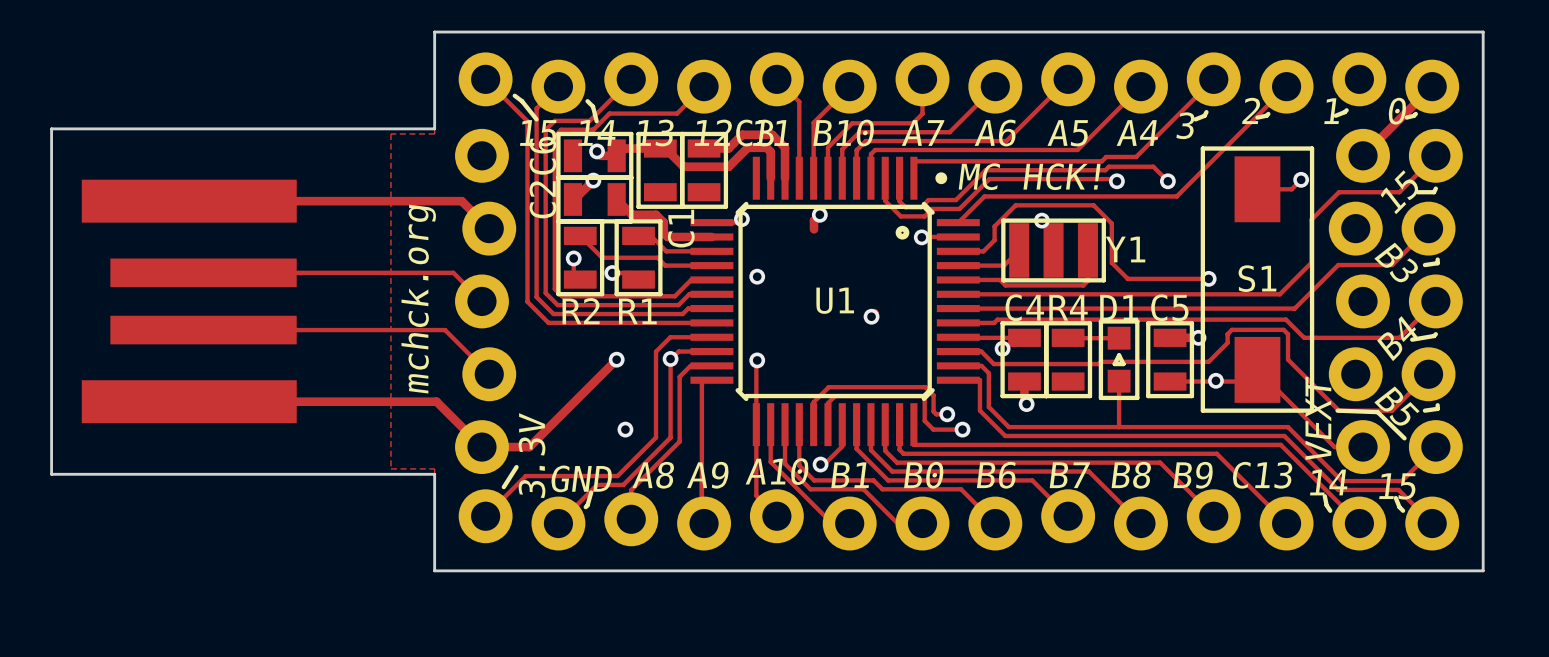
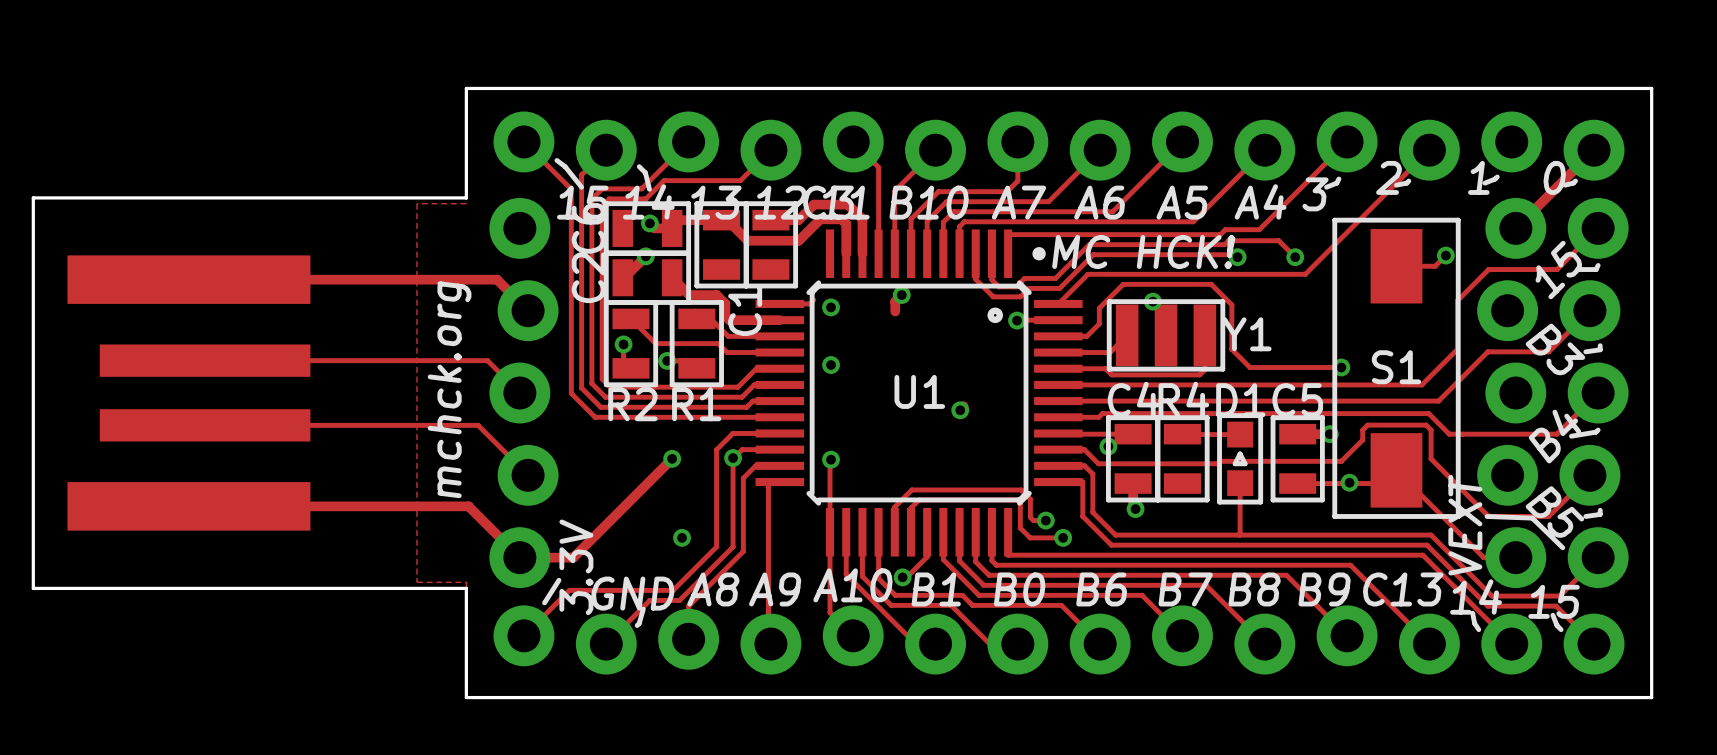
via position: (741, 219) -> (831, 307)

